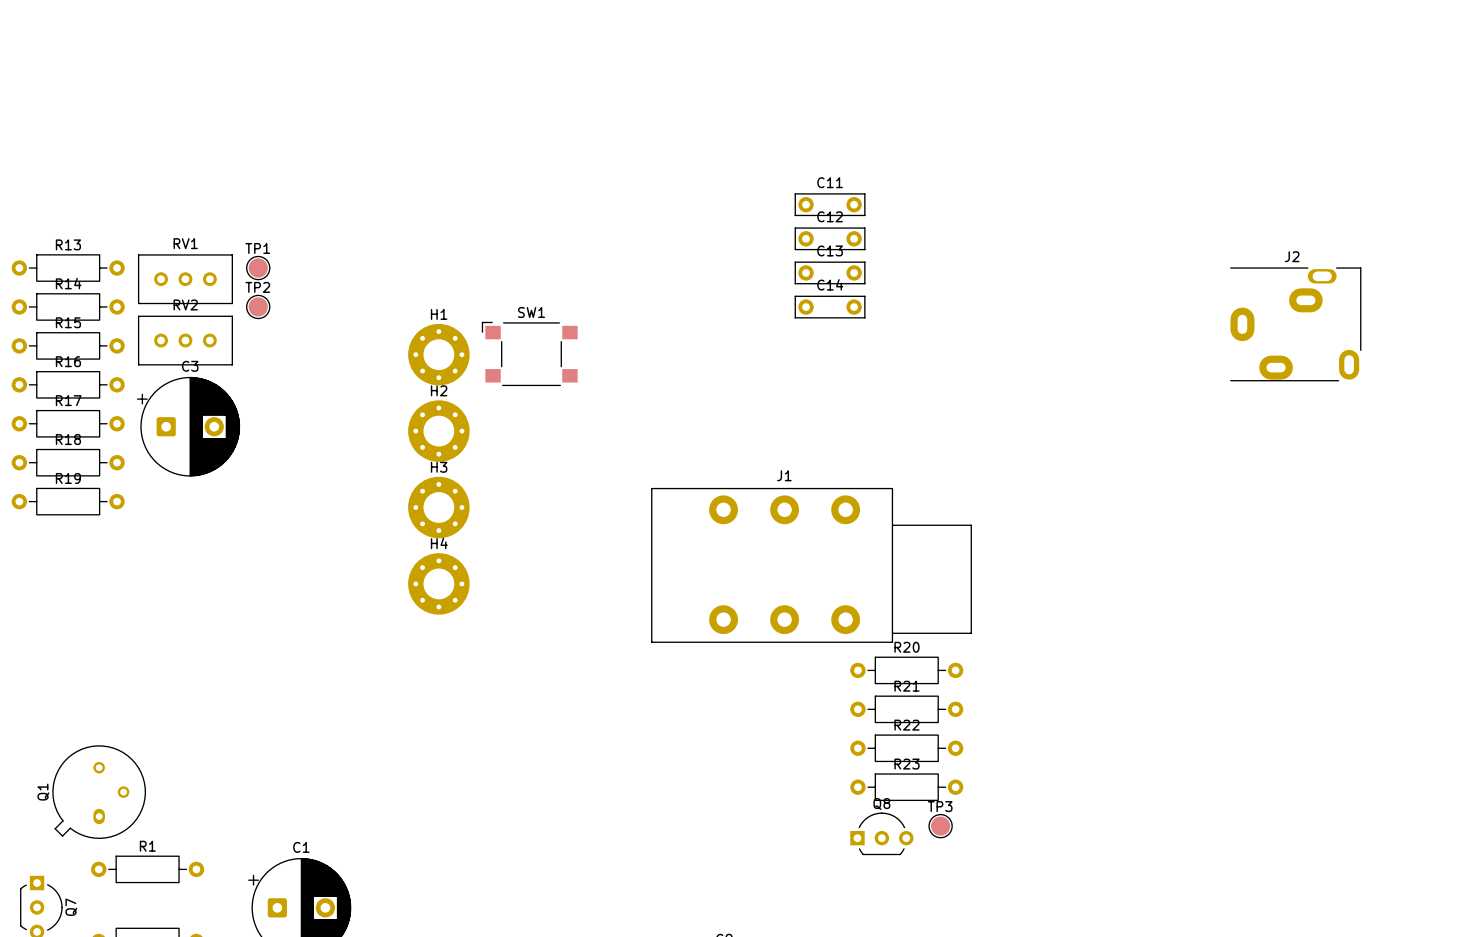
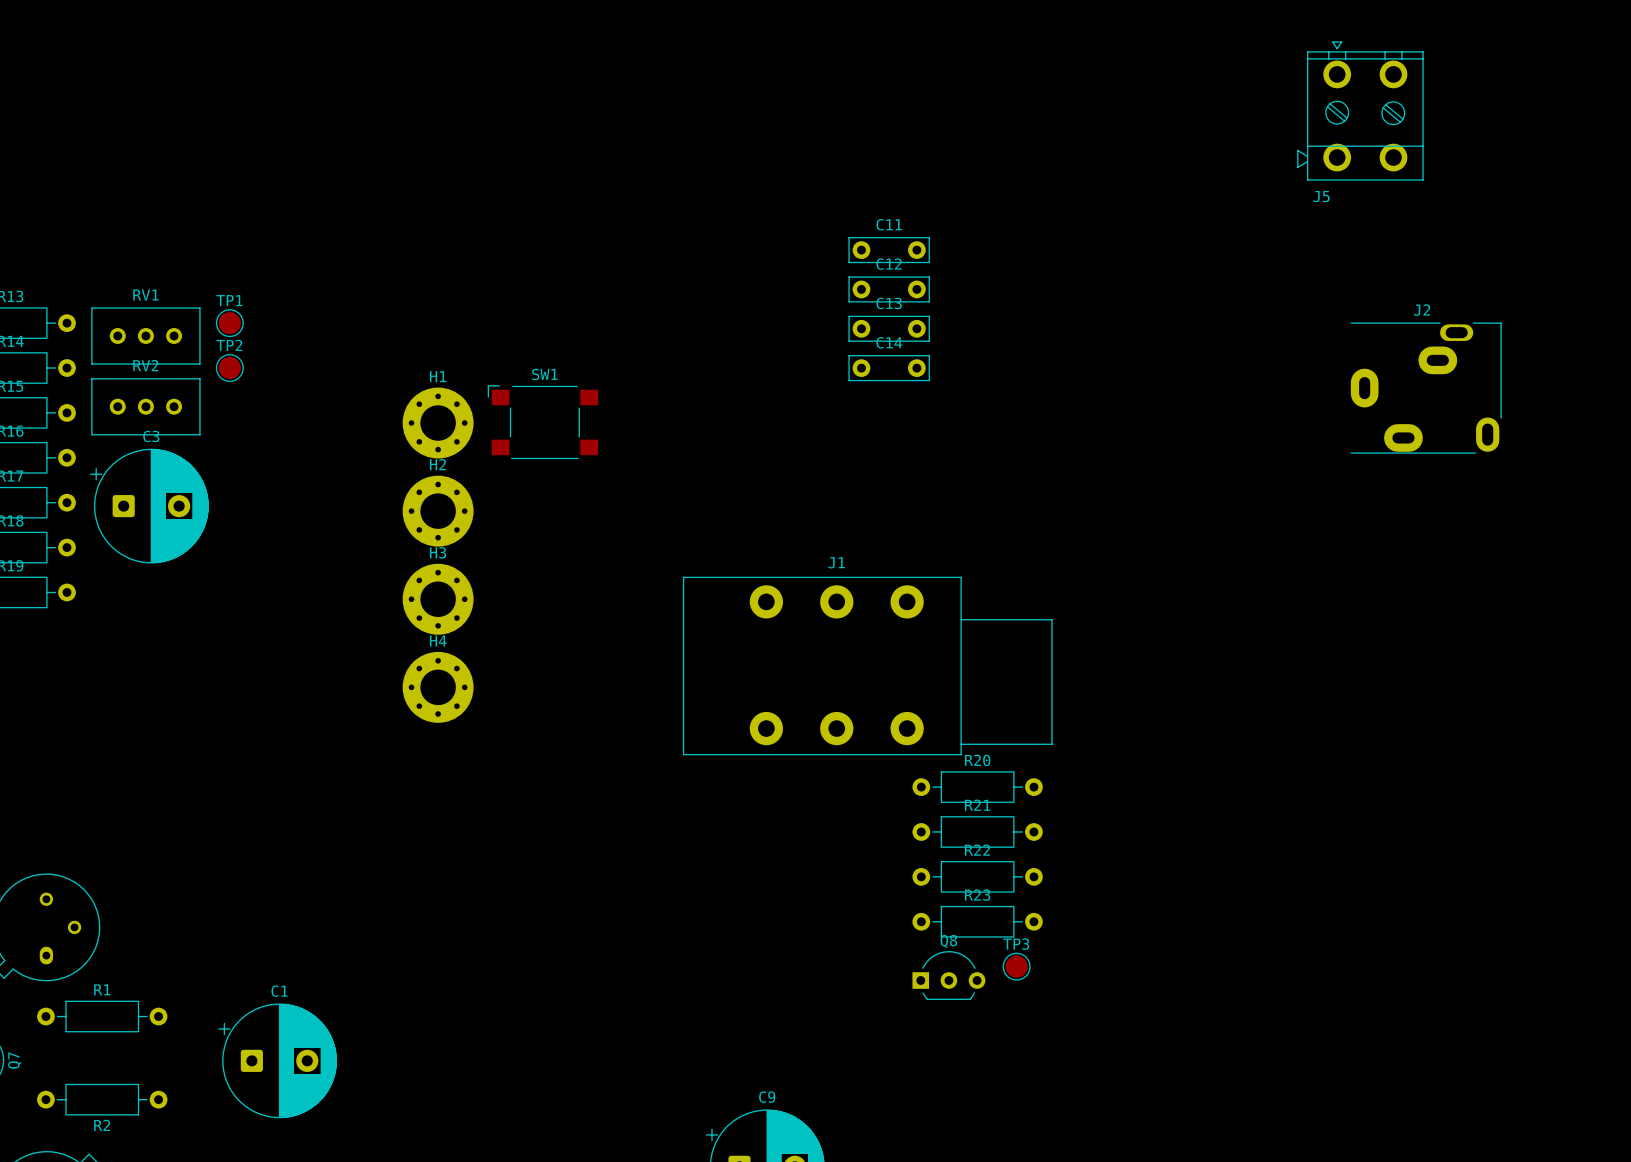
J5: none -> (1360, 111)

